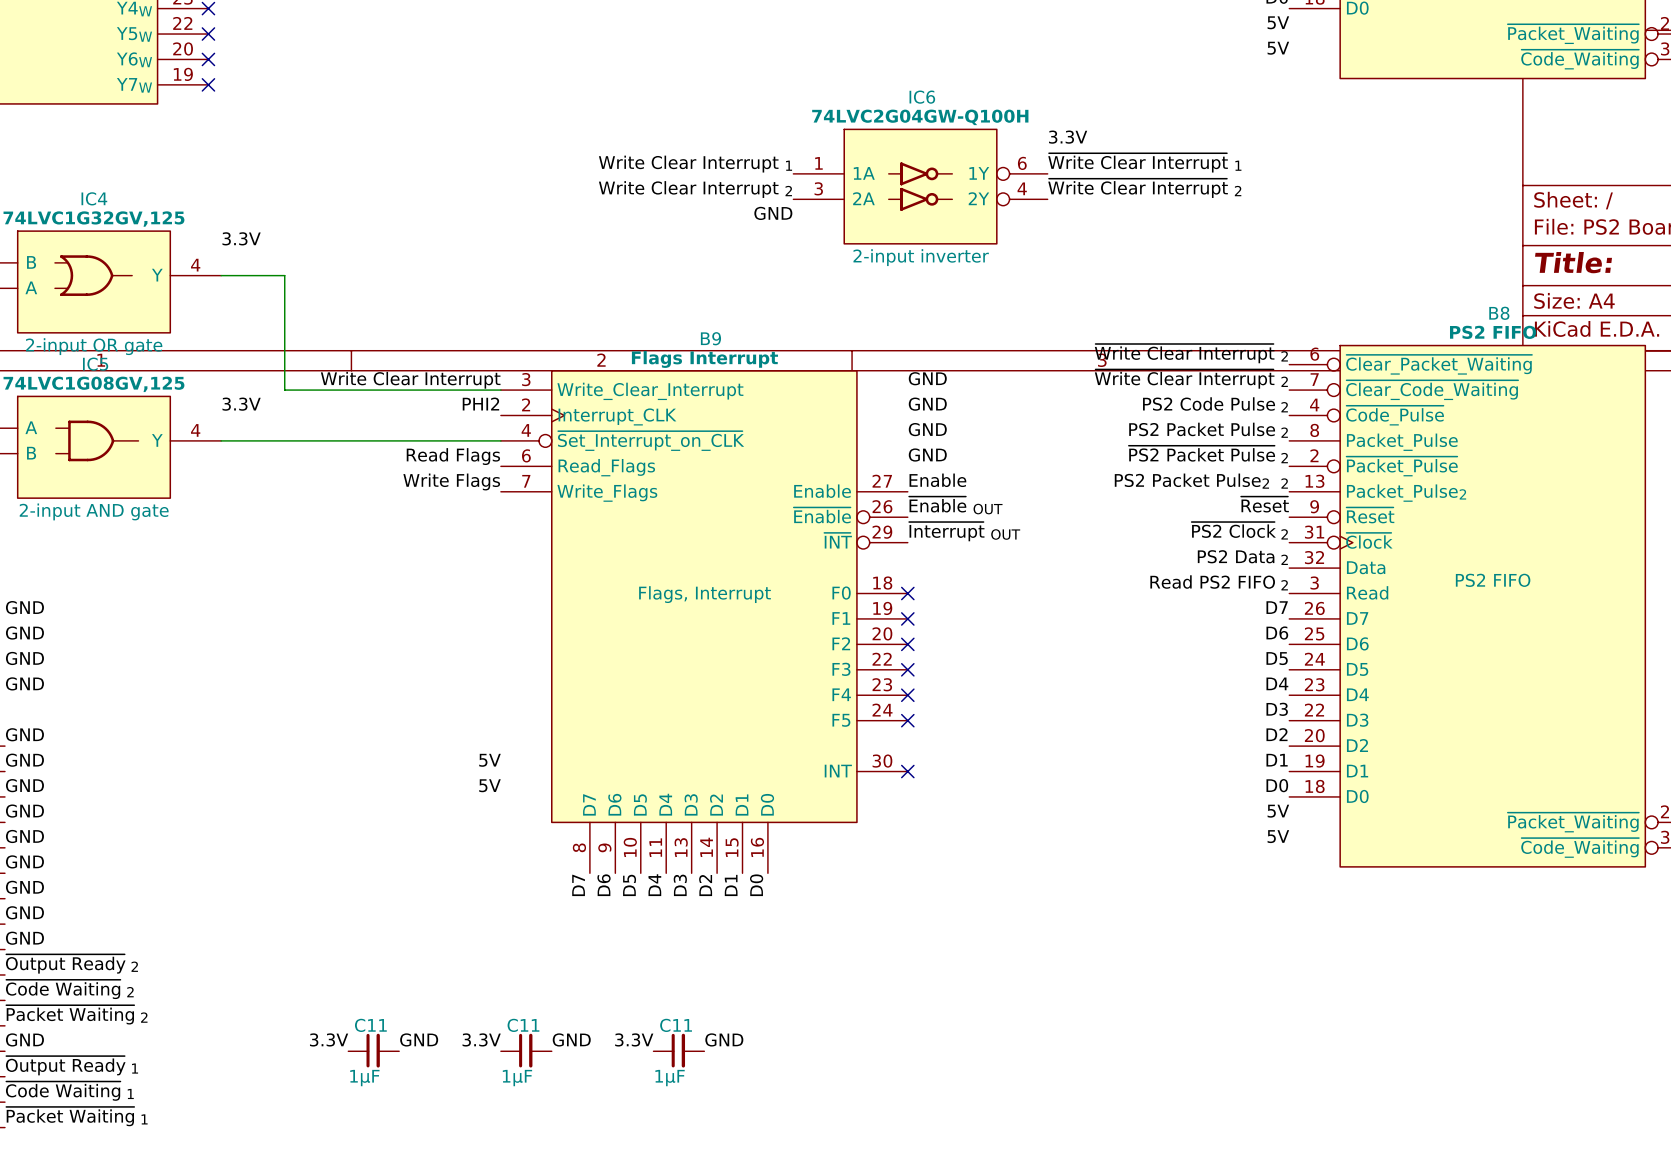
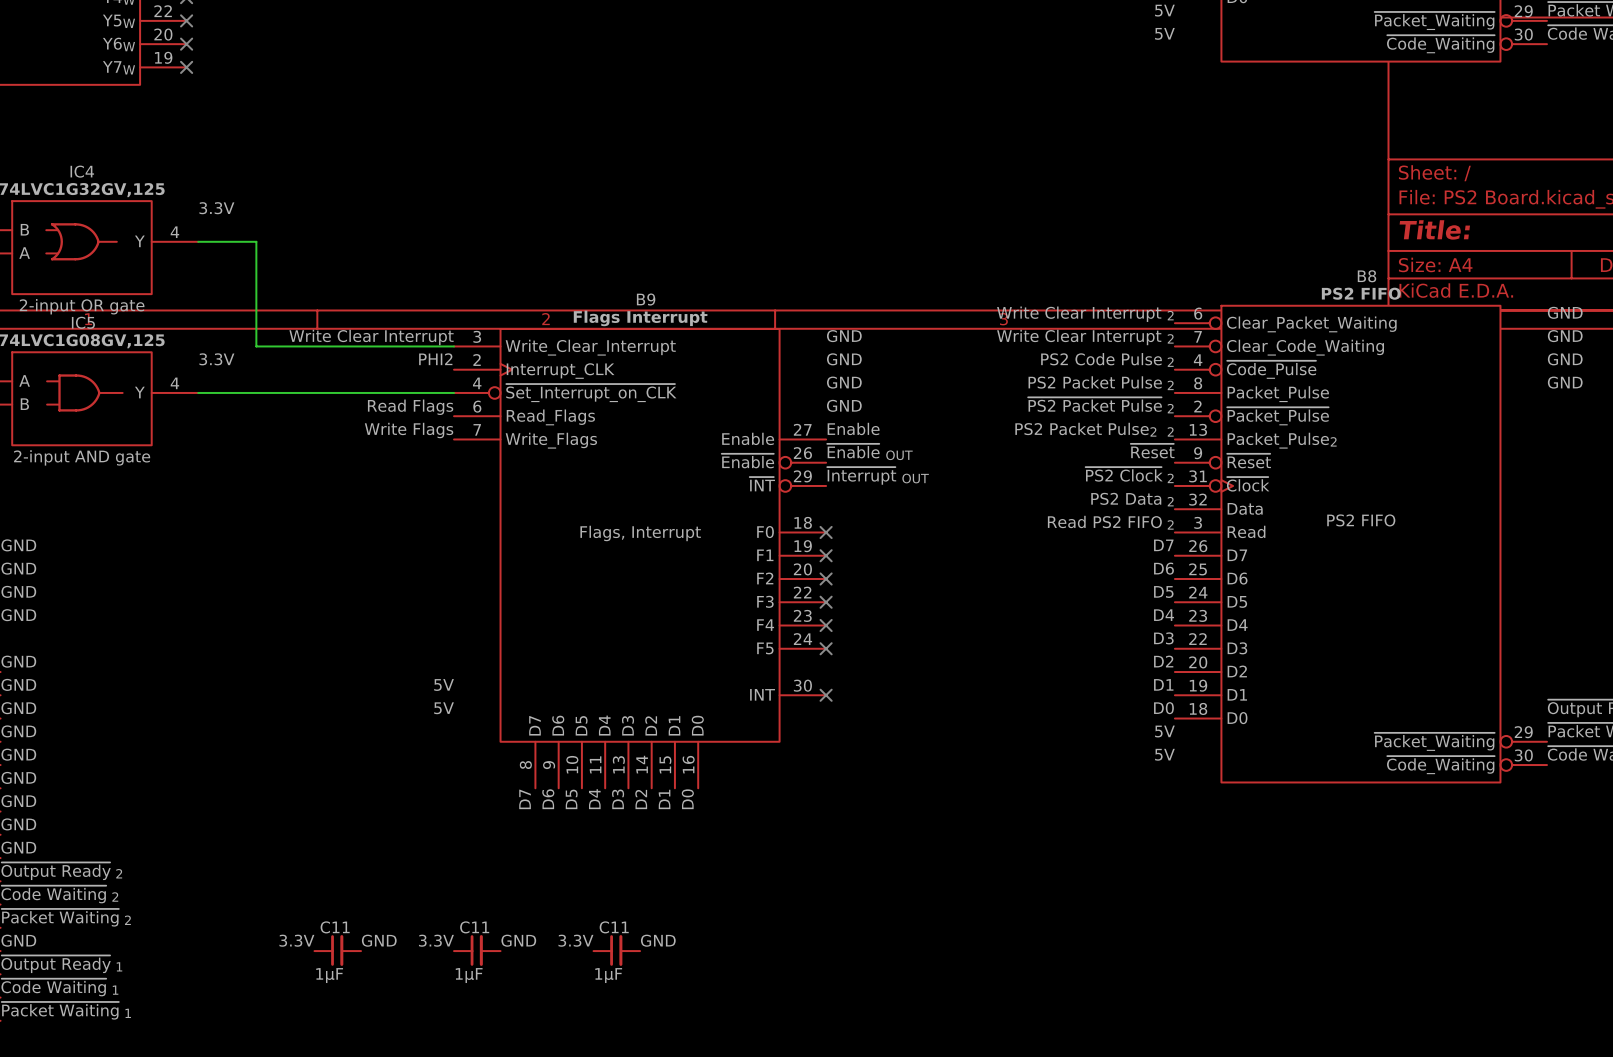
label: 3.3V (1068, 137) -> none
label: ~{Write Clear Interrupt} 1 (1144, 162) -> none
label: Write Clear Interrupt 1 (695, 164) -> none
IC6: 74LVC2G04GW-Q100H (920, 186) -> none
label: ~{Write Clear Interrupt} 2 (1144, 188) -> none
label: Write Clear Interrupt 2 (695, 189) -> none
label: GND (773, 213) -> none
label: ~{Write Clear Interrupt} 2 (1191, 353) -> Write Clear Interrupt 2 (1085, 314)
B8 pin name: ~{Clear_Packet_Waiting} (1439, 364) -> Clear_Packet_Waiting (1311, 324)
label: ~{Write Clear Interrupt} 2 (1191, 379) -> Write Clear Interrupt 2 (1085, 337)
B8 pin name: ~{Clear_Code_Waiting} (1432, 390) -> Clear_Code_Waiting (1305, 347)

